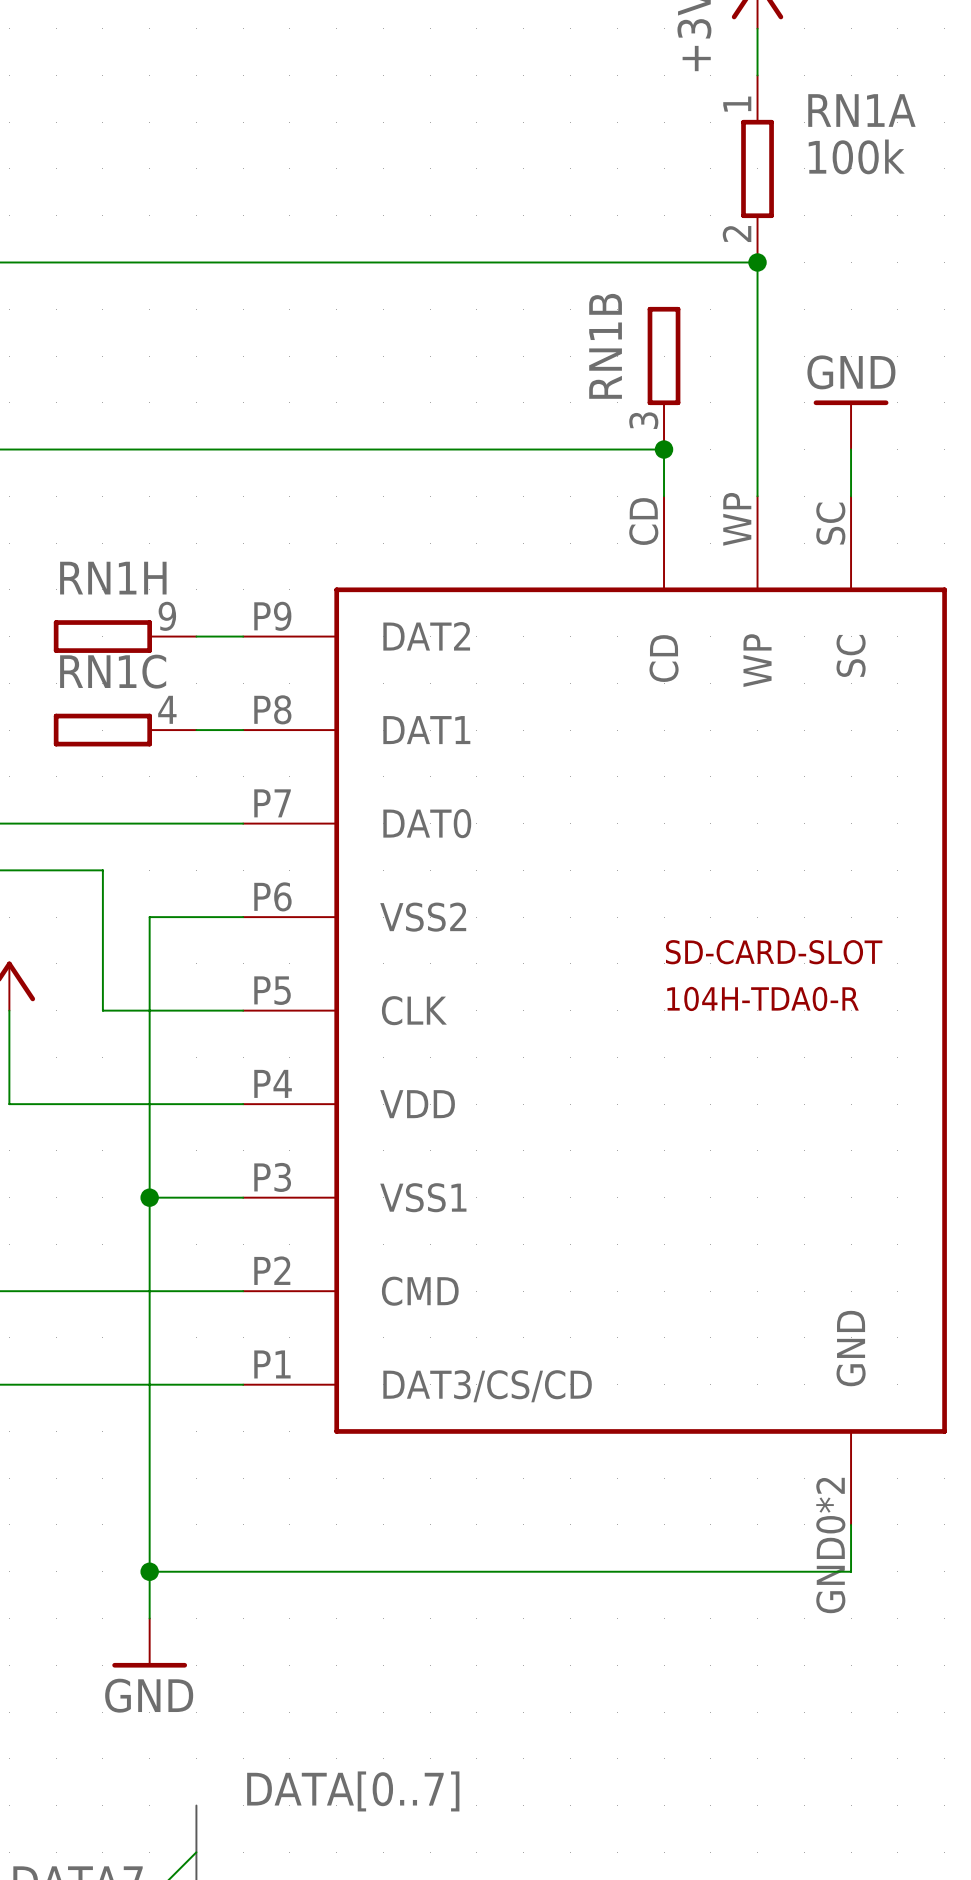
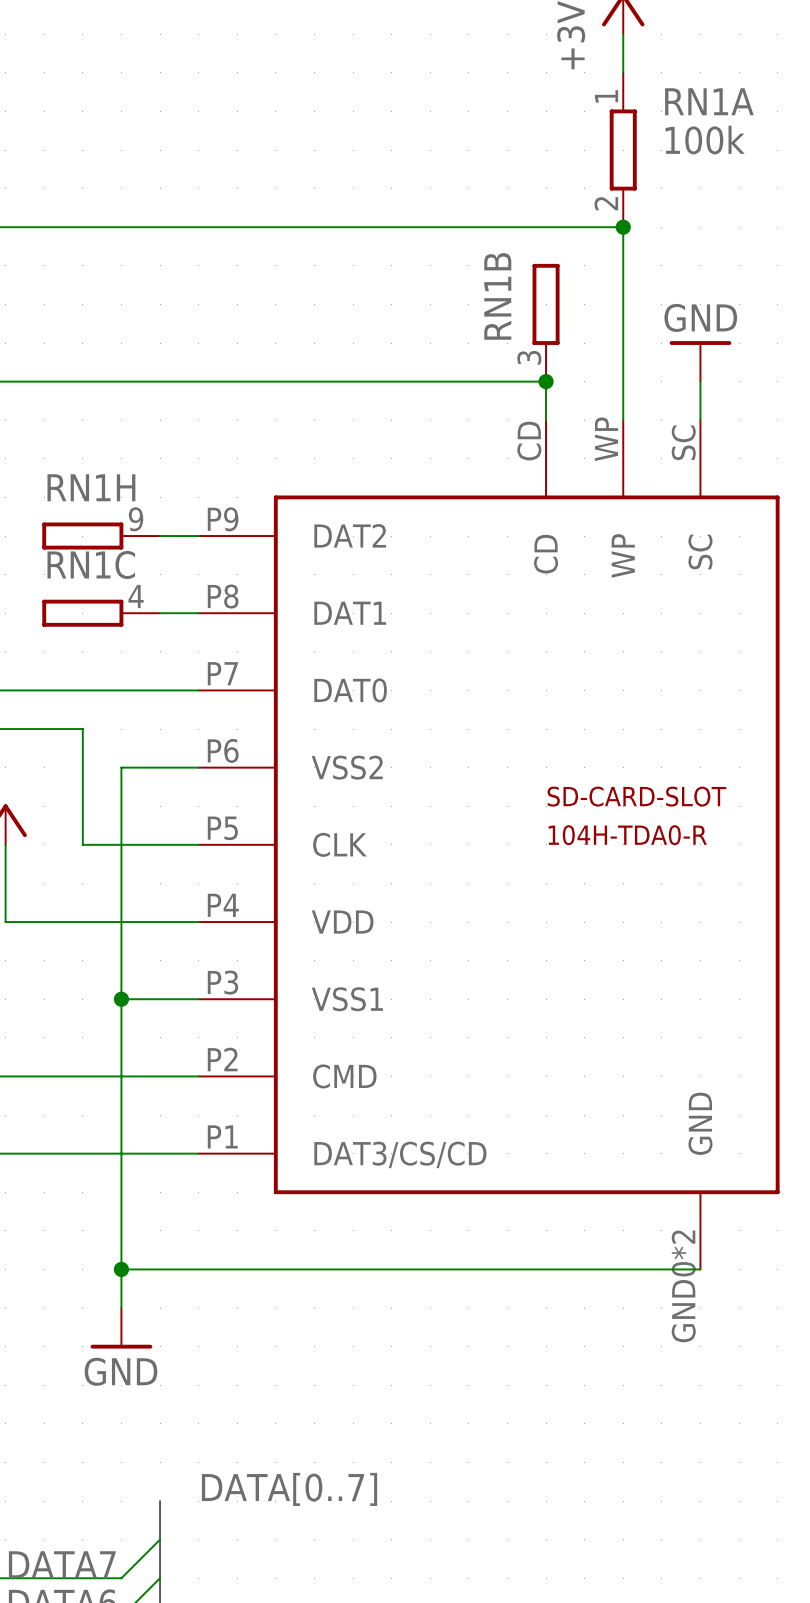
wire: (851, 1524) (851, 1571) (149, 1571) (149, 1618) -> (700, 1269) (121, 1269)
junction position: (149, 1571) -> (121, 1269)
power symbol position: GND (149, 1643) -> GND (121, 1328)

